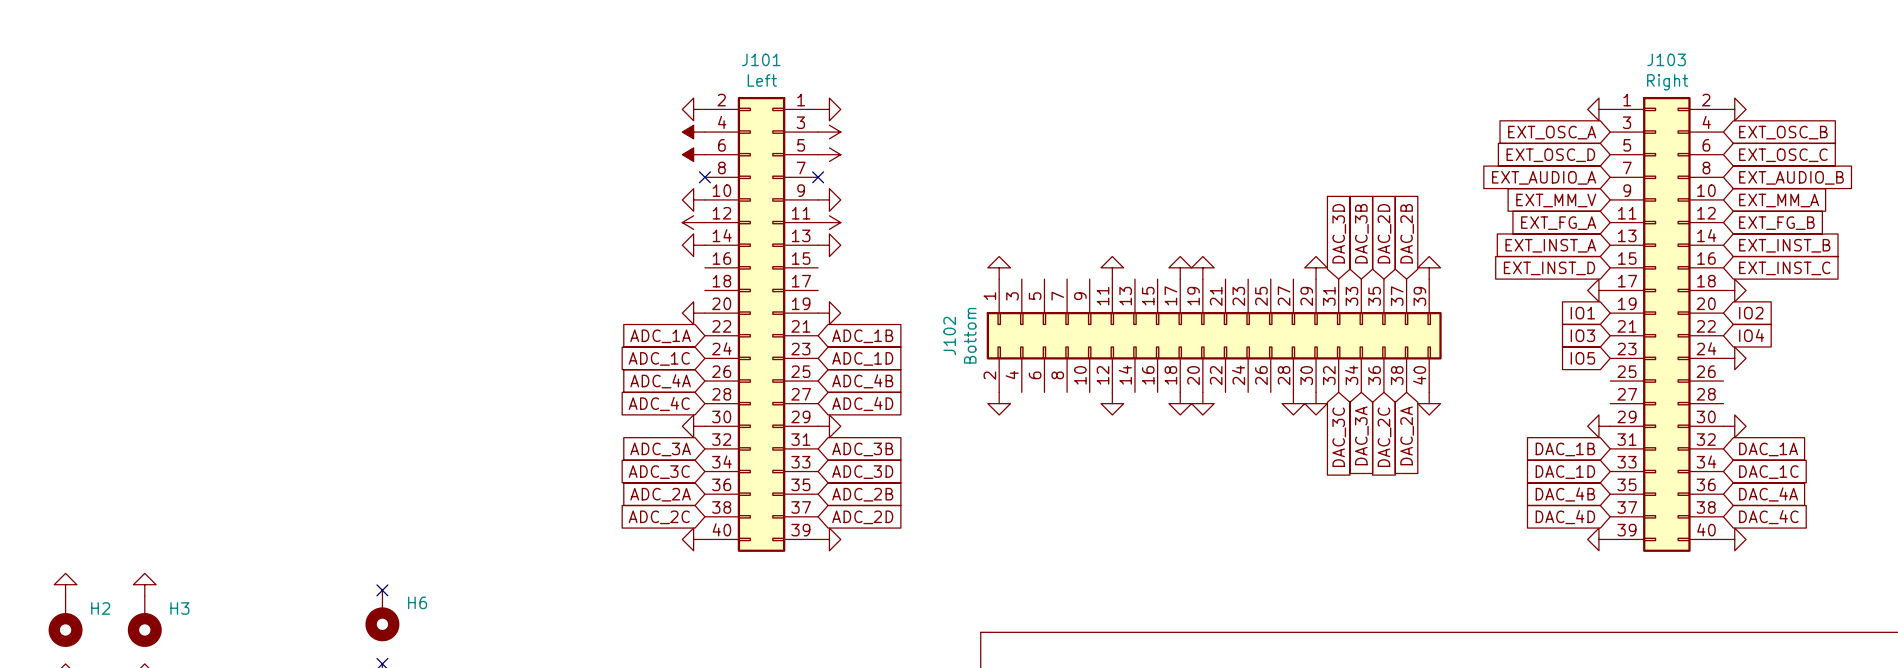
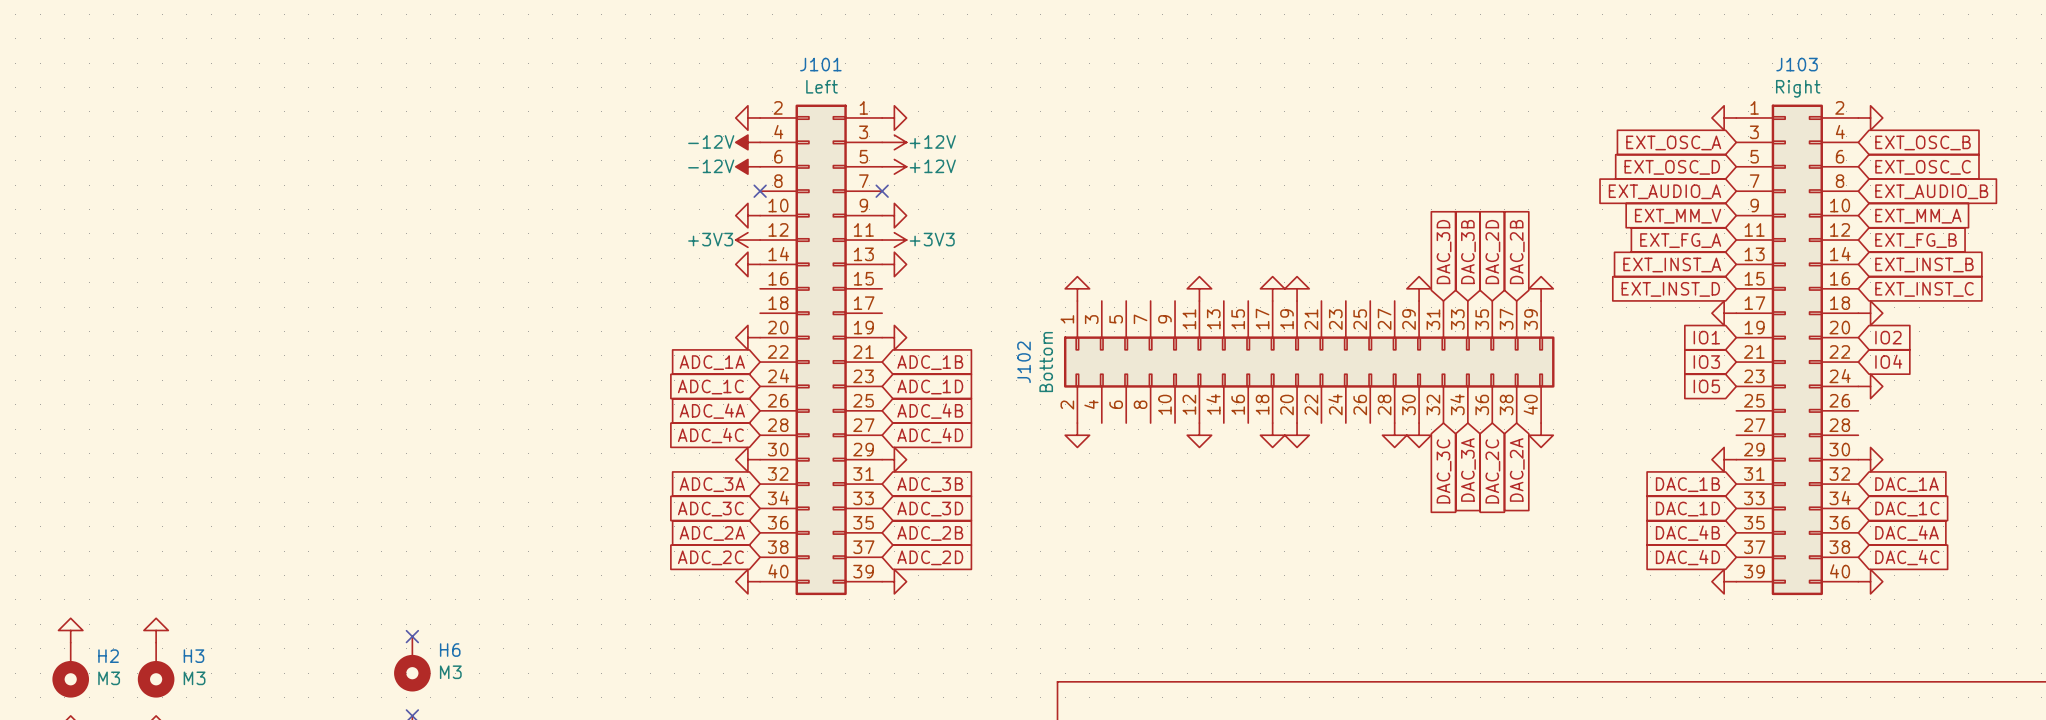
power symbol text: none -> -12V (711, 141)
power symbol text: none -> +12V (932, 141)
power symbol text: none -> -12V (711, 166)
power symbol text: none -> +12V (932, 166)
power symbol text: none -> +3V3 (710, 239)
power symbol text: none -> +3V3 (932, 239)
H6 value: none -> M3 (450, 672)
H2 value: none -> M3 (109, 678)
H3 value: none -> M3 (194, 678)

